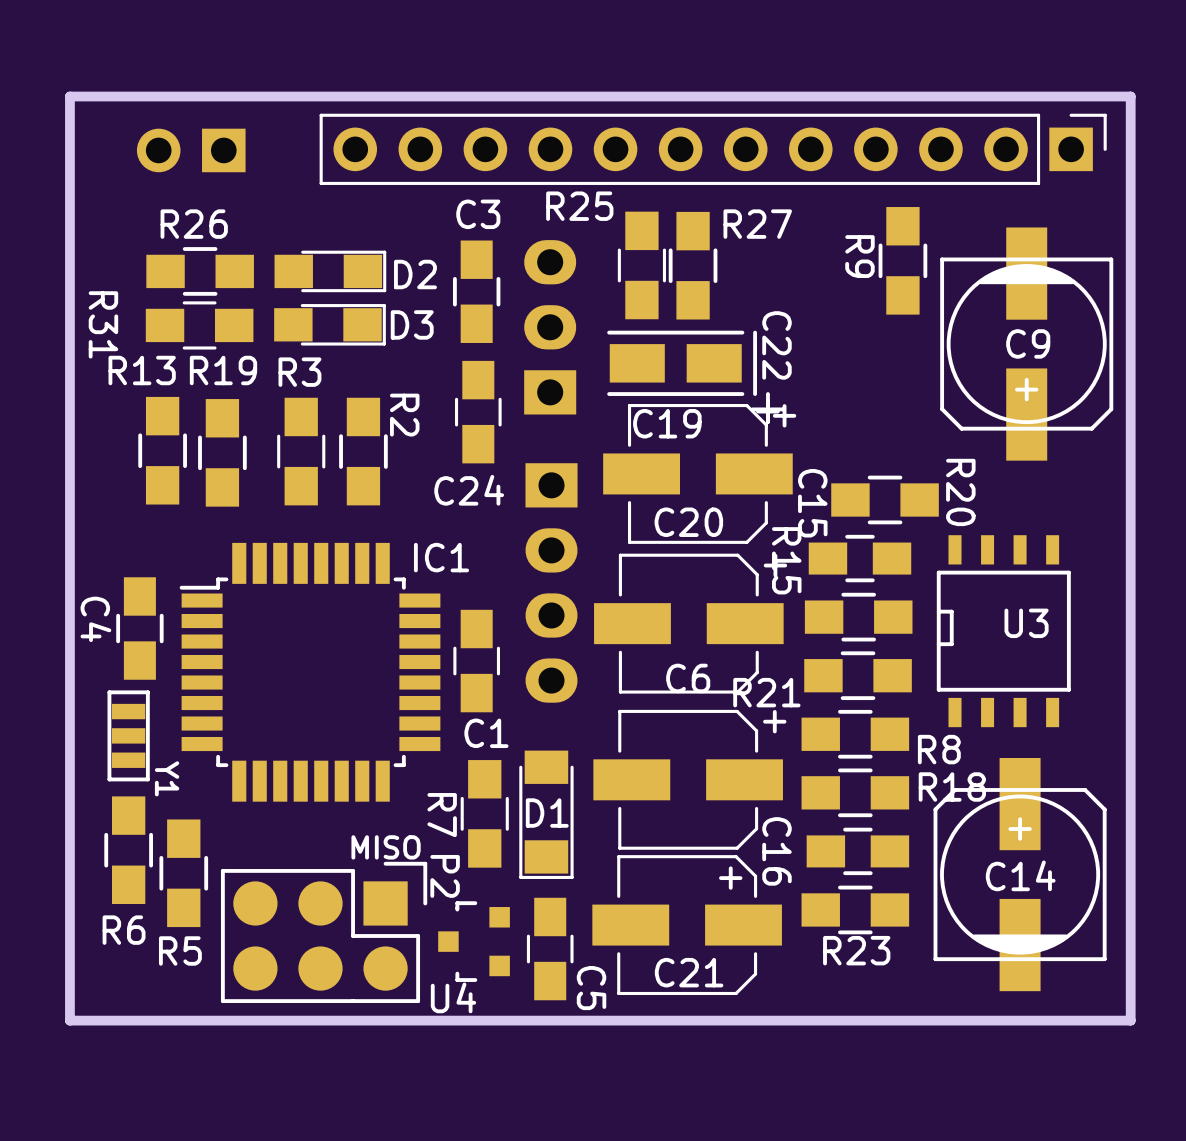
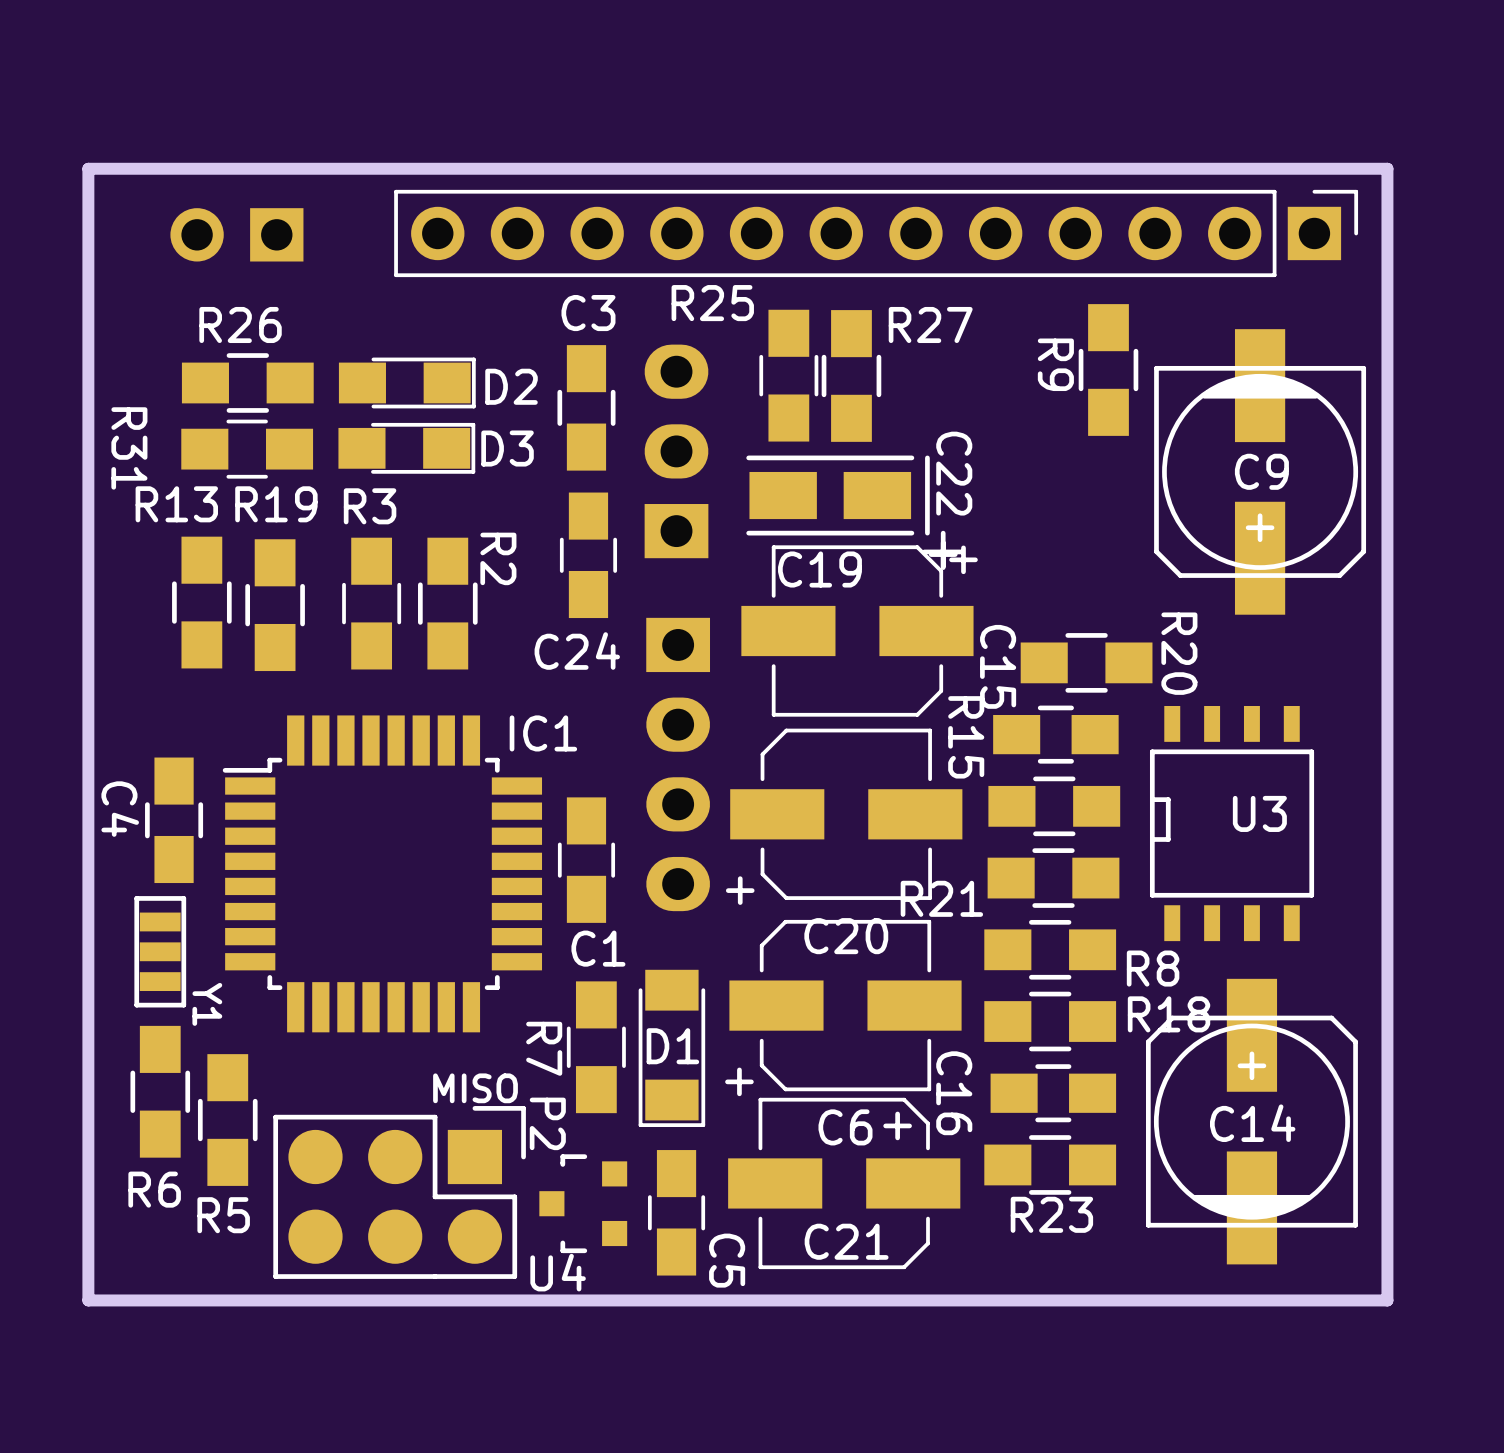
C20 rotation: 0° (688, 623) -> 180° (846, 814)
C6 rotation: 0° (688, 779) -> 180° (845, 1005)

